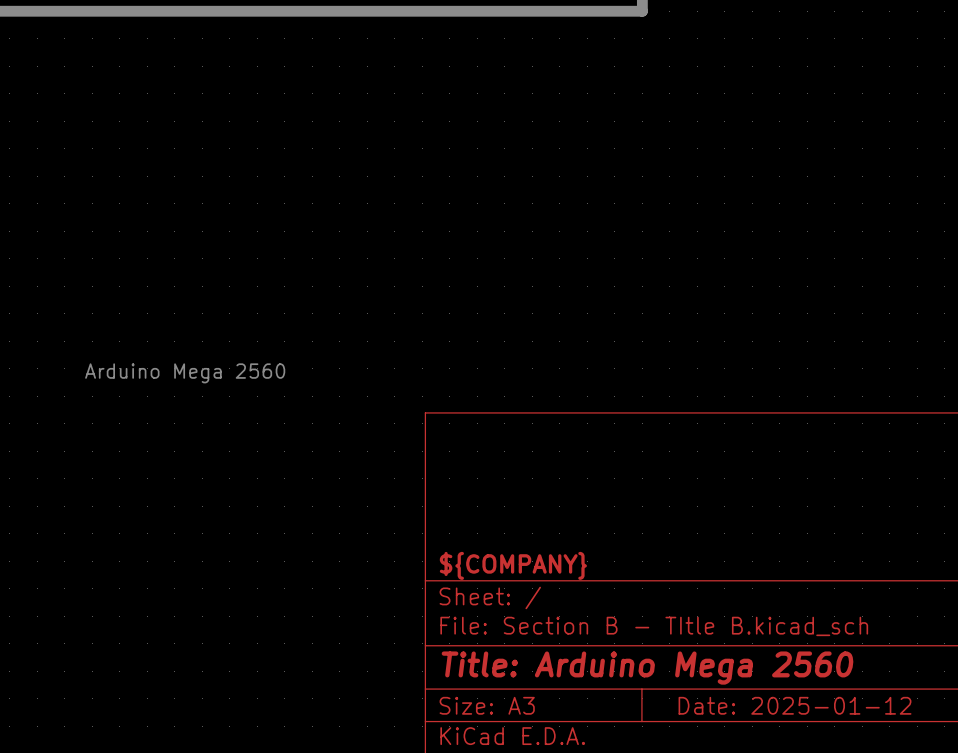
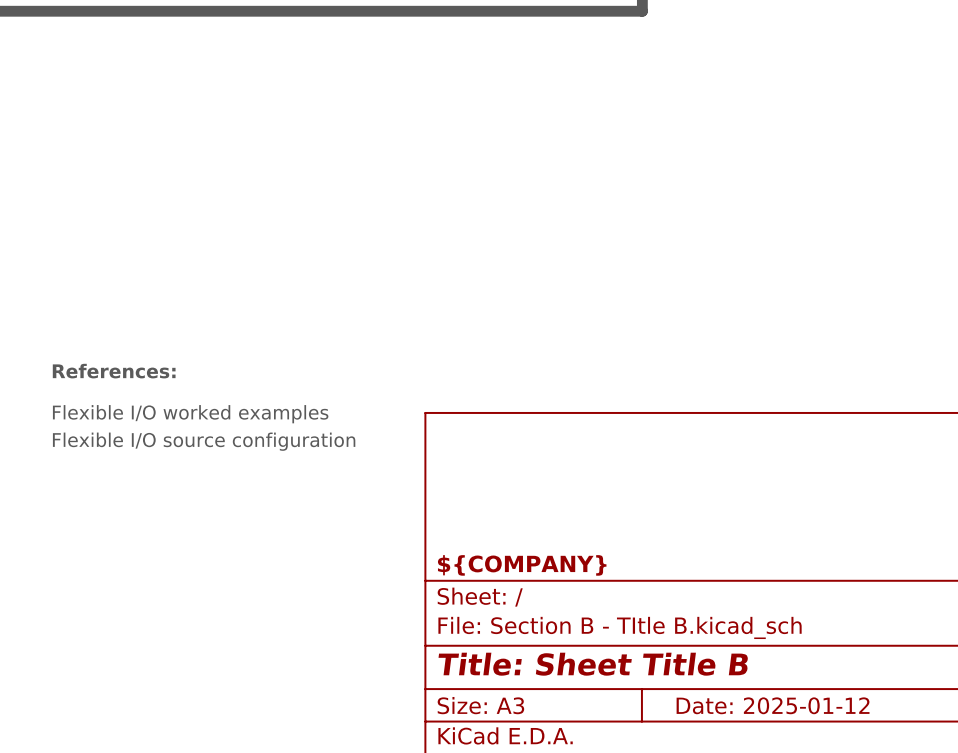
text: none -> References: (114, 371)
text: Arduino Mega 2560 (185, 373) -> none
text: none -> Flexible I/O worked examples (190, 414)
text: none -> Flexible I/O source configuration (204, 441)
title block: Title: Arduino Mega 2560 (647, 668) -> Title: Sheet Title B (593, 664)

